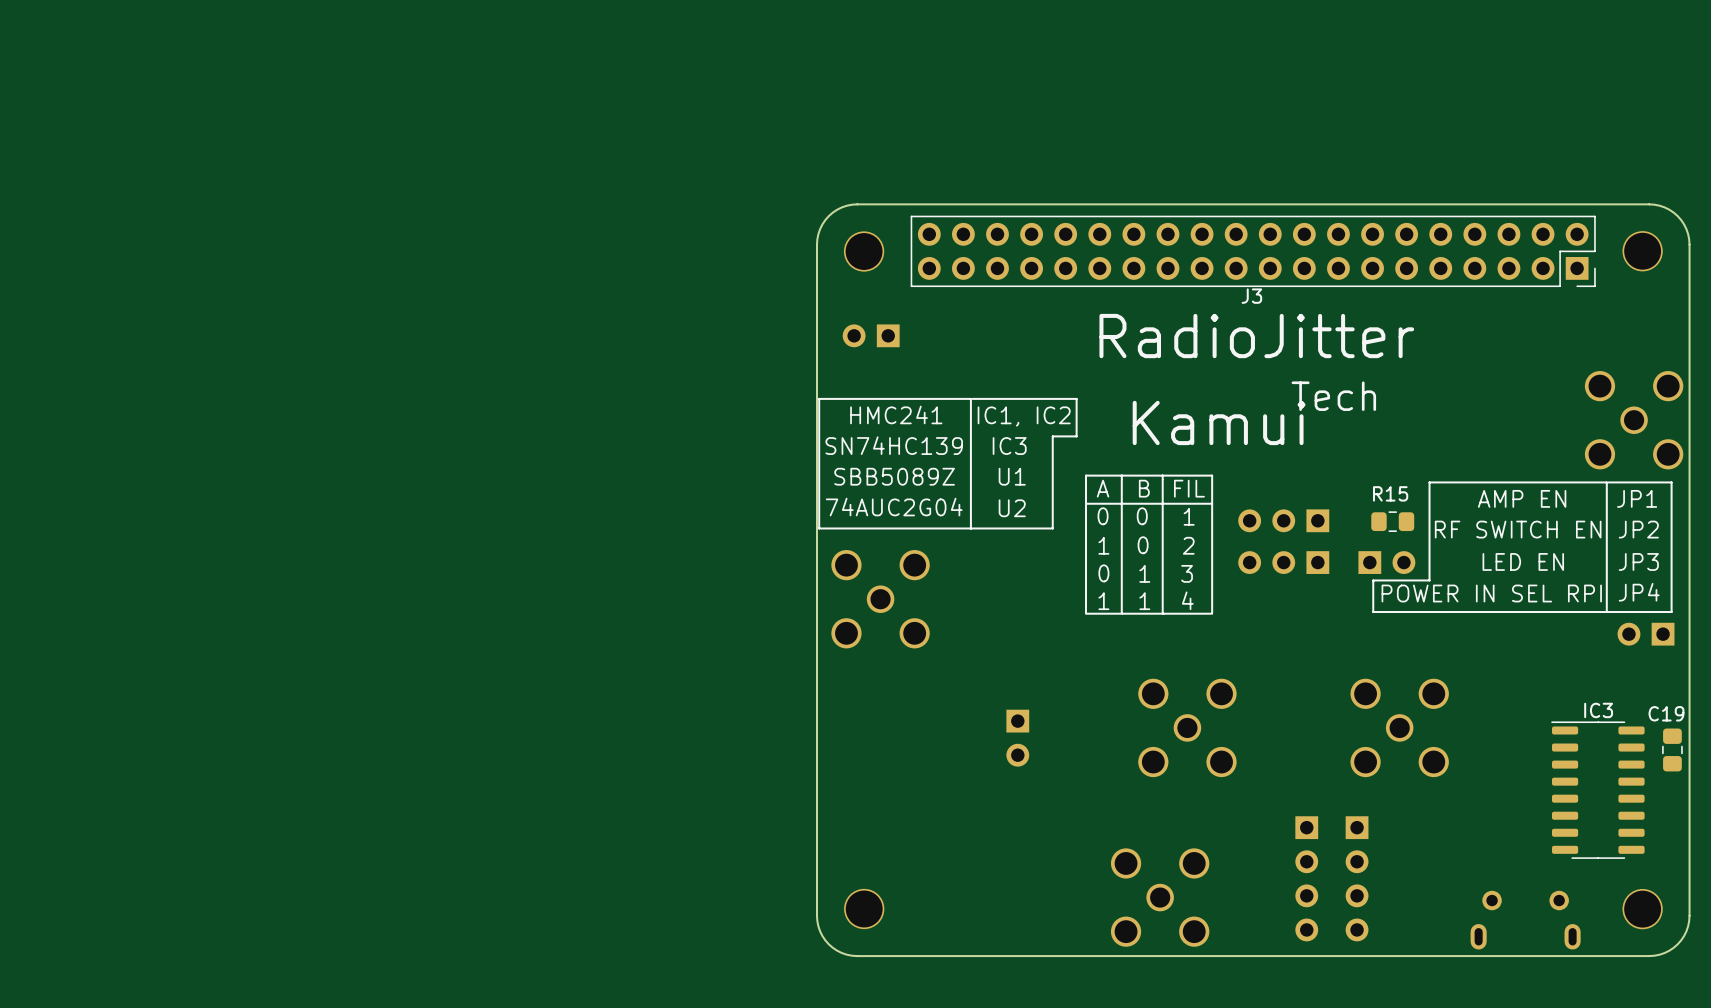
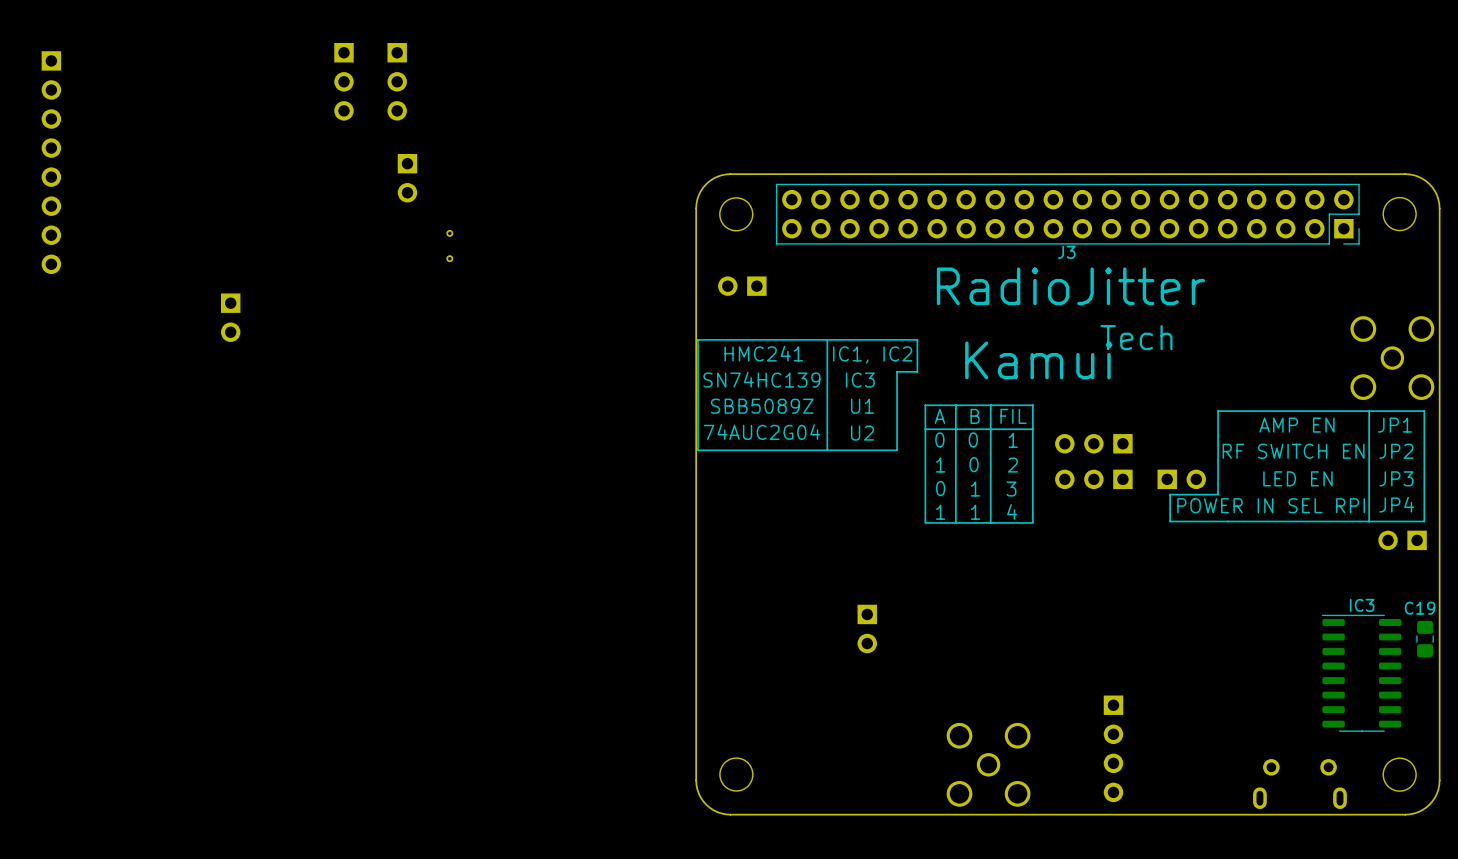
part: none -> (343, 81)
part: none -> (397, 81)
part: none -> (51, 162)
part: none -> (407, 178)
part: none -> (449, 246)
part: none -> (230, 317)
R15: (1392, 521) -> none
part: (880, 599) -> none
part: (1187, 727) -> none
part: (1399, 727) -> none
part: (1357, 878) -> none

